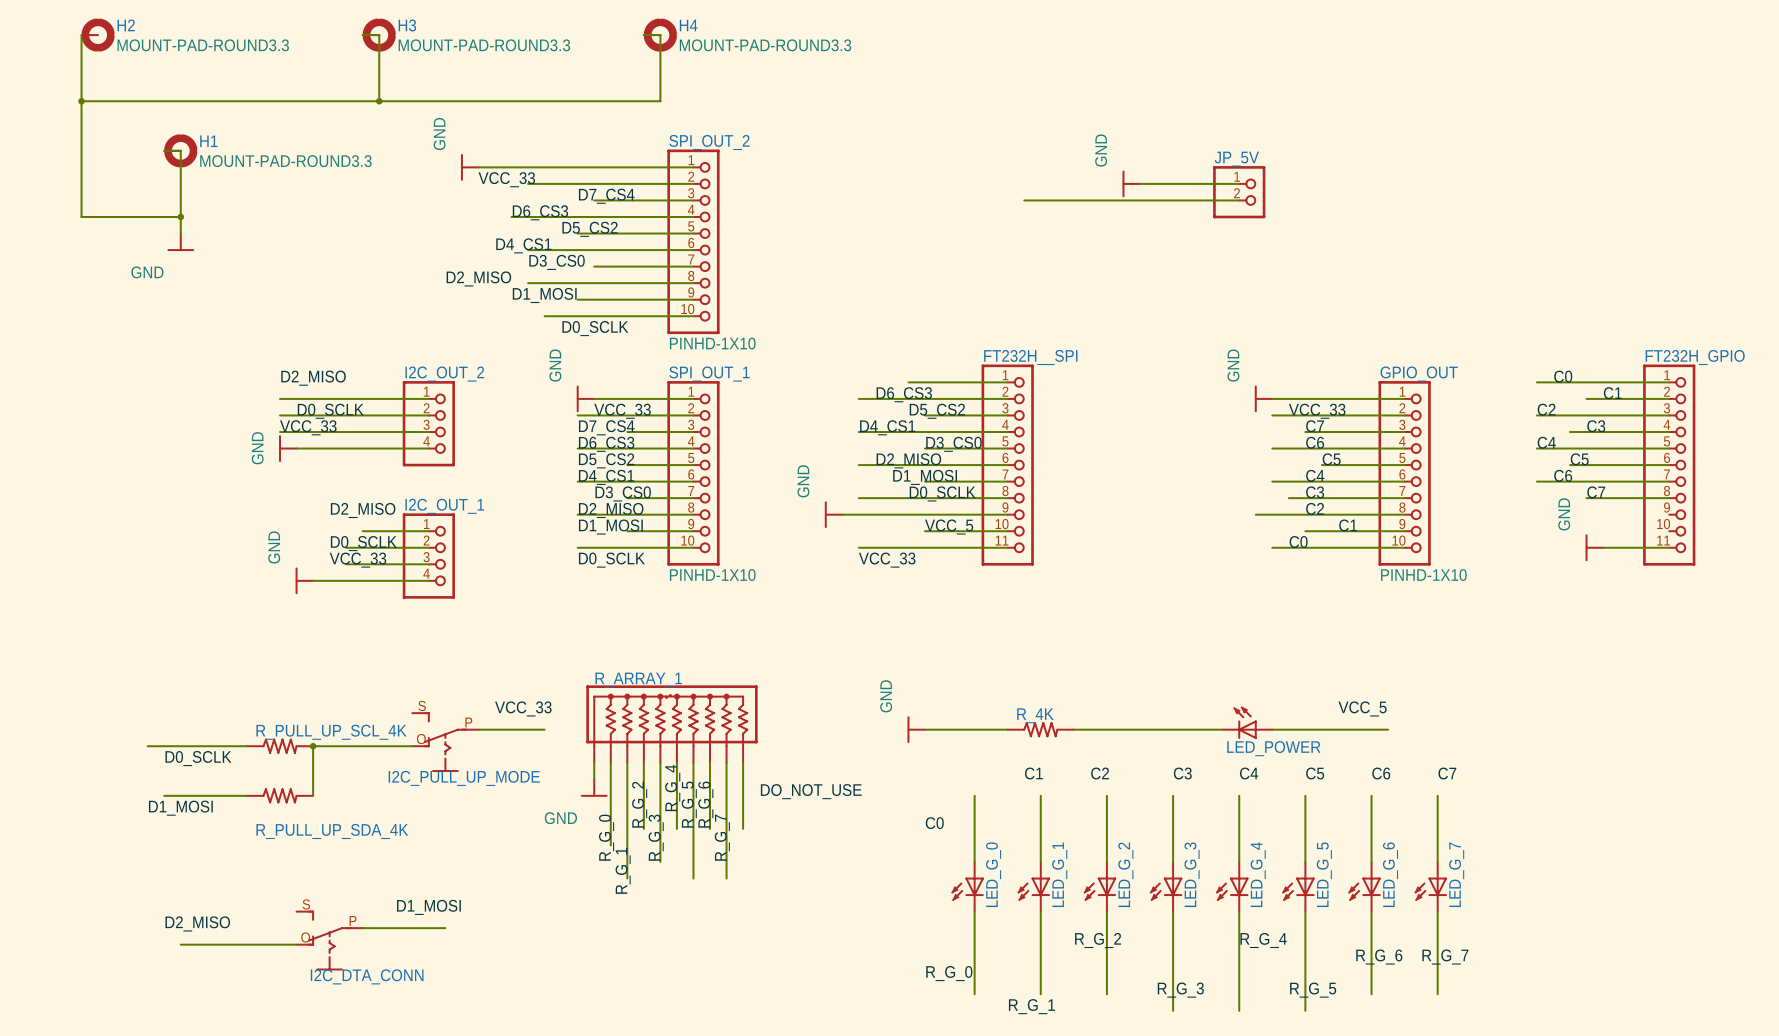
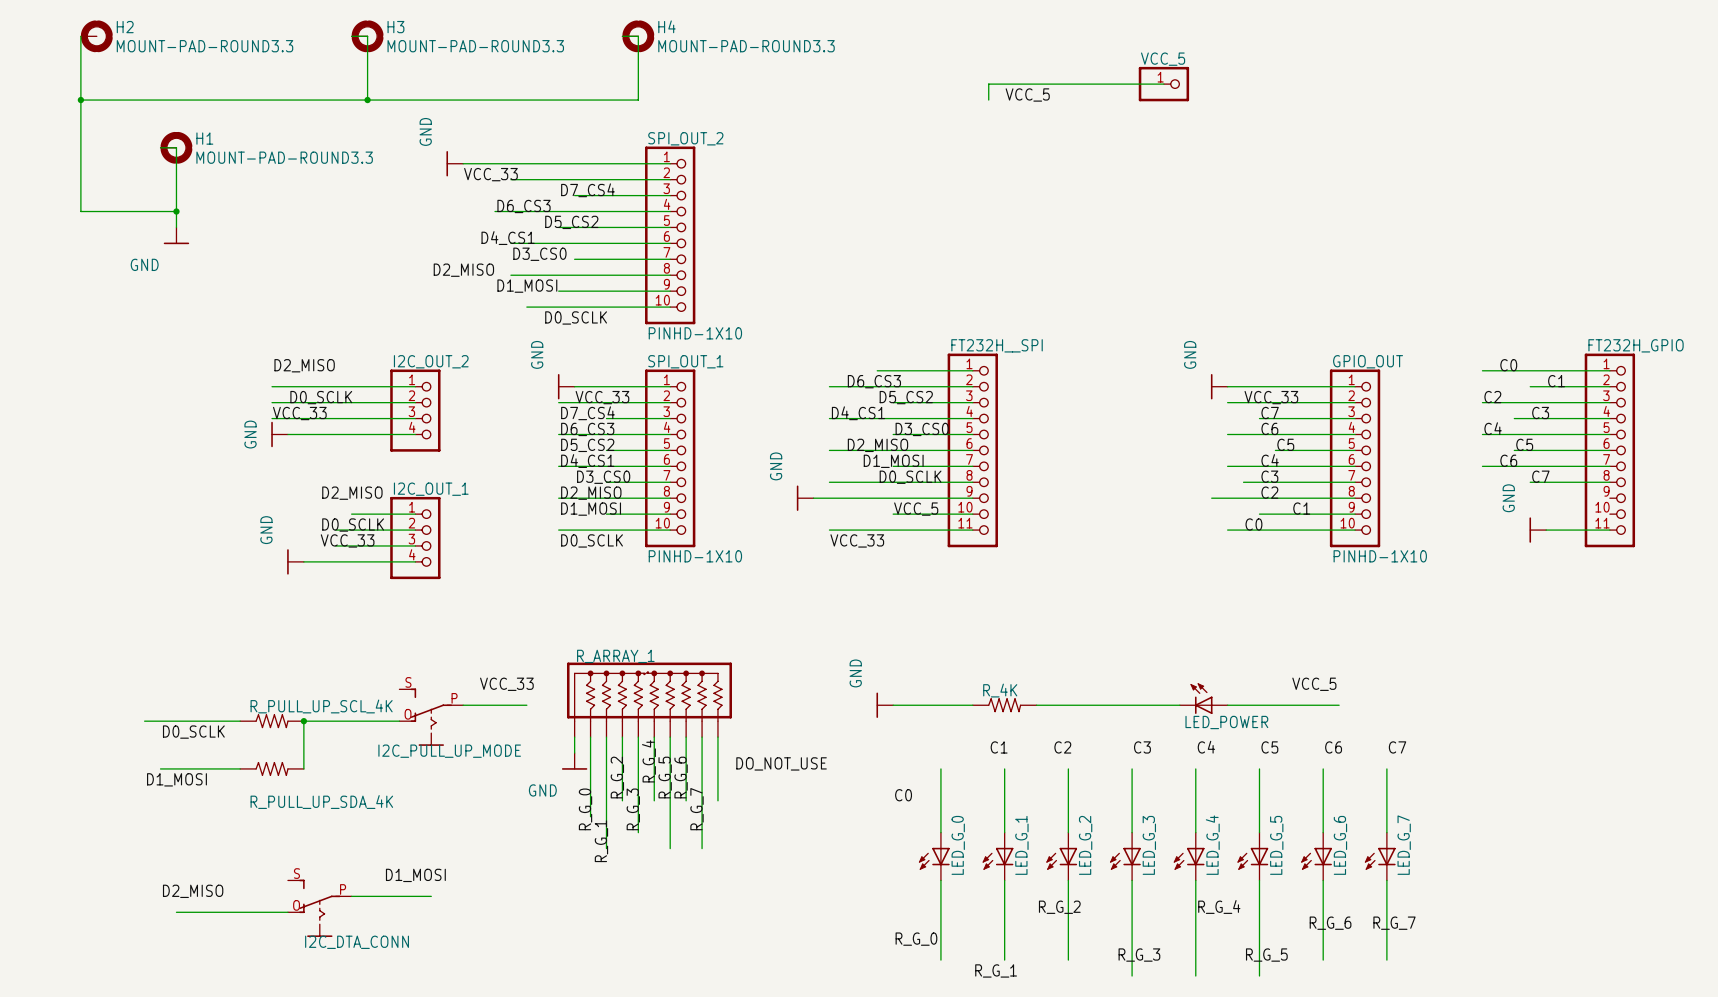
wire: none -> (1163, 84) (988, 84) (988, 100)
VCC_5: none -> (1163, 84)
label: none -> VCC_5 (1027, 94)
power symbol: GND (1131, 183) -> none
wire: (1140, 183) (1239, 183) -> none
JP_5V: (1239, 192) -> none
wire: (1024, 200) (1239, 200) -> none

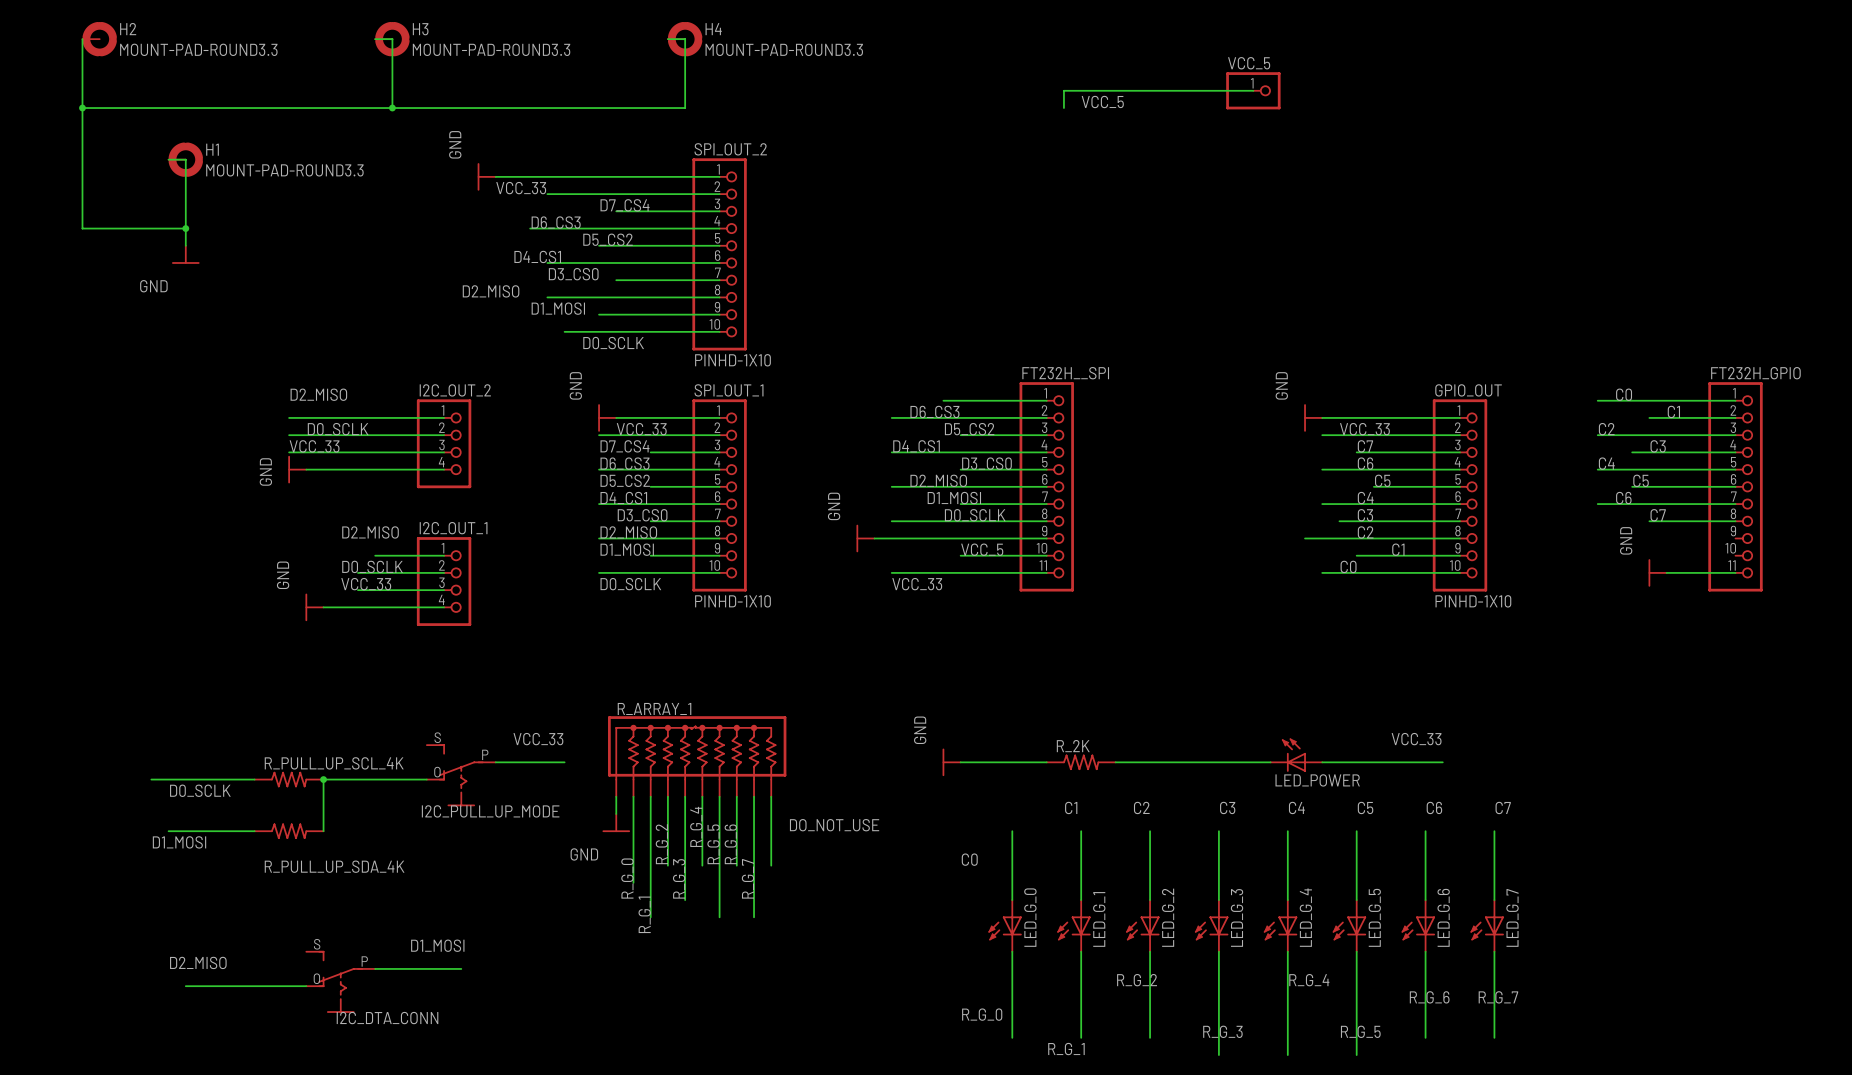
label: VCC_5 (1314, 684) -> VCC_33 (1416, 739)
R_4K name: R_4K (1000, 690) -> R_2K (1073, 746)

